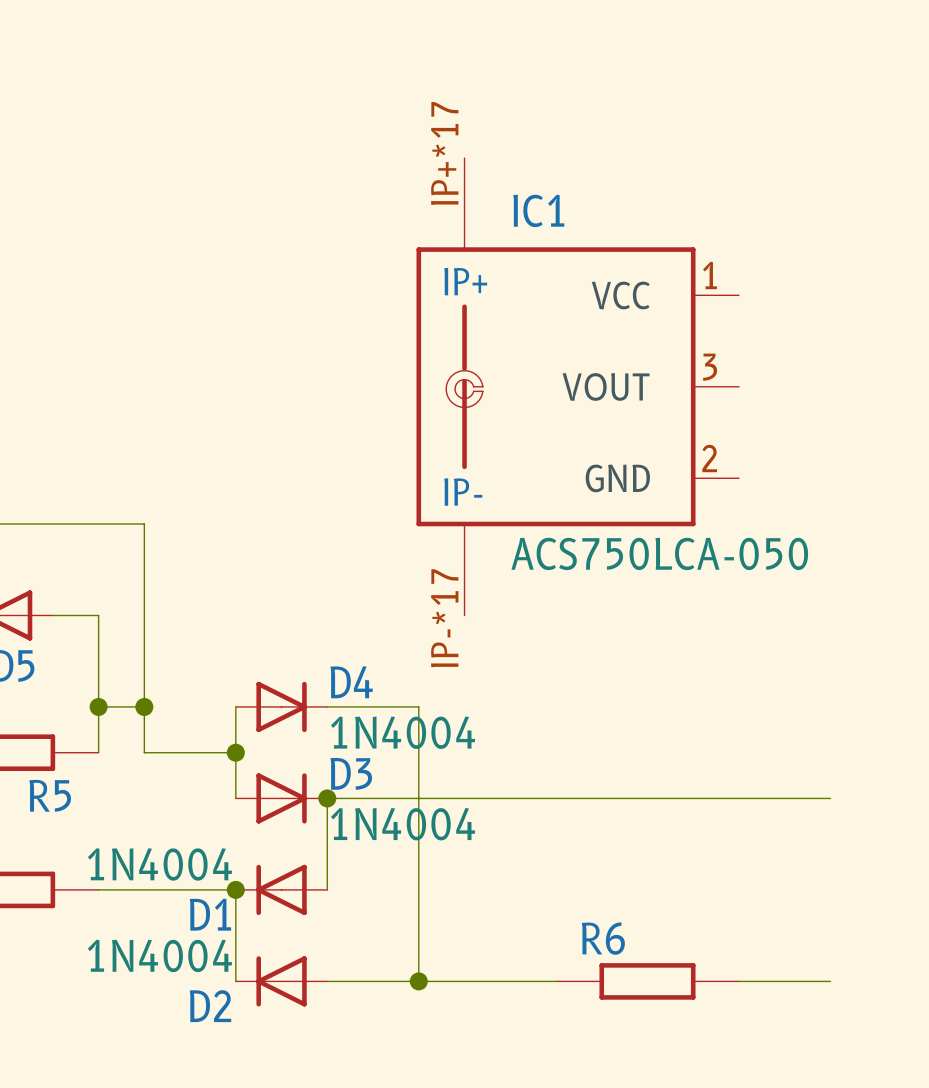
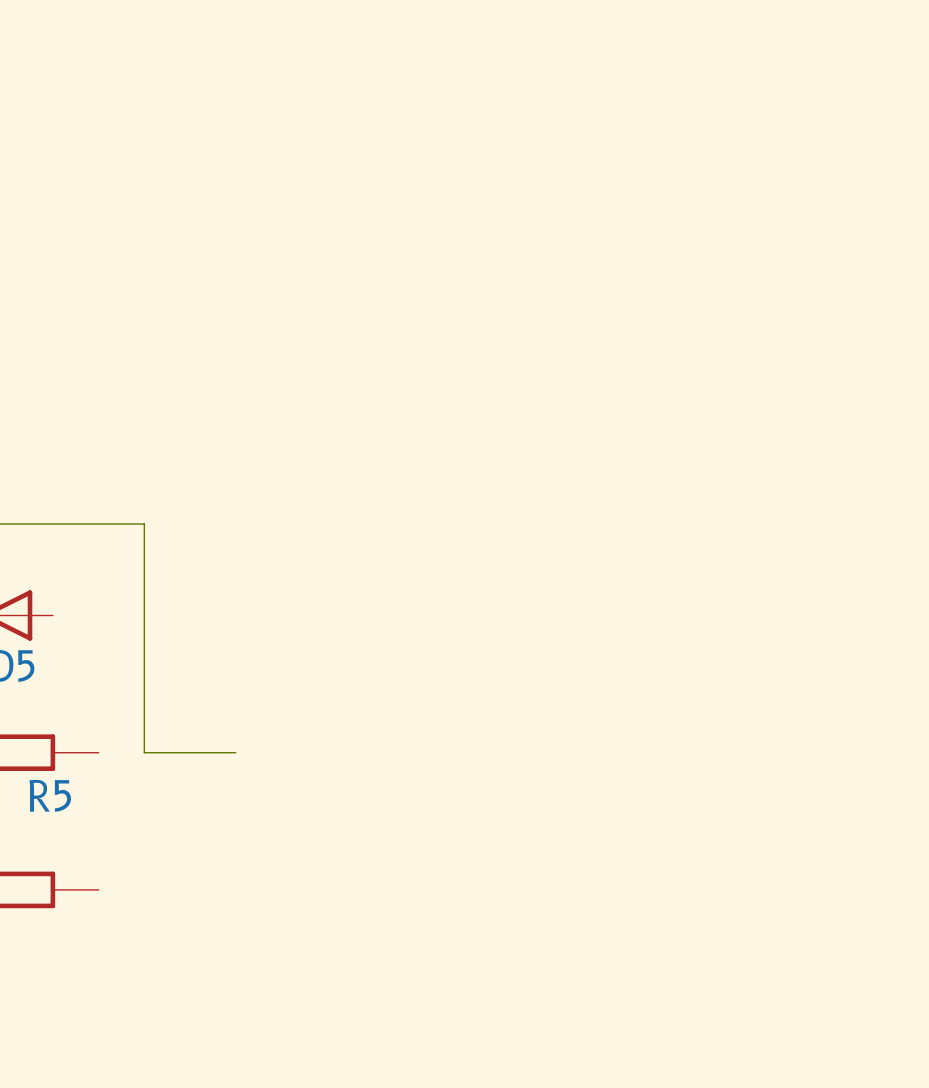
IC1: ACS750LCA-050 (577, 386) -> none
wire: (52, 615) (98, 615) (98, 752) -> none
wire: (98, 706) (144, 706) -> none
junction: (98, 706) -> none
junction: (144, 706) -> none
wire: (235, 706) (235, 798) -> none
D4: 1N4004 (281, 706) -> none
wire: (327, 706) (418, 706) (418, 981) -> none
junction: (235, 752) -> none
D3: 1N4004 (281, 798) -> none
junction: (327, 798) -> none
wire: (830, 798) (327, 798) (327, 889) -> none
wire: (98, 889) (235, 889) (235, 981) -> none
junction: (235, 889) -> none
D1: 1N4004 (281, 889) -> none
D2: 1N4004 (281, 981) -> none
wire: (327, 981) (556, 981) -> none
junction: (418, 981) -> none
R6: (647, 981) -> none
wire: (738, 981) (830, 981) -> none

